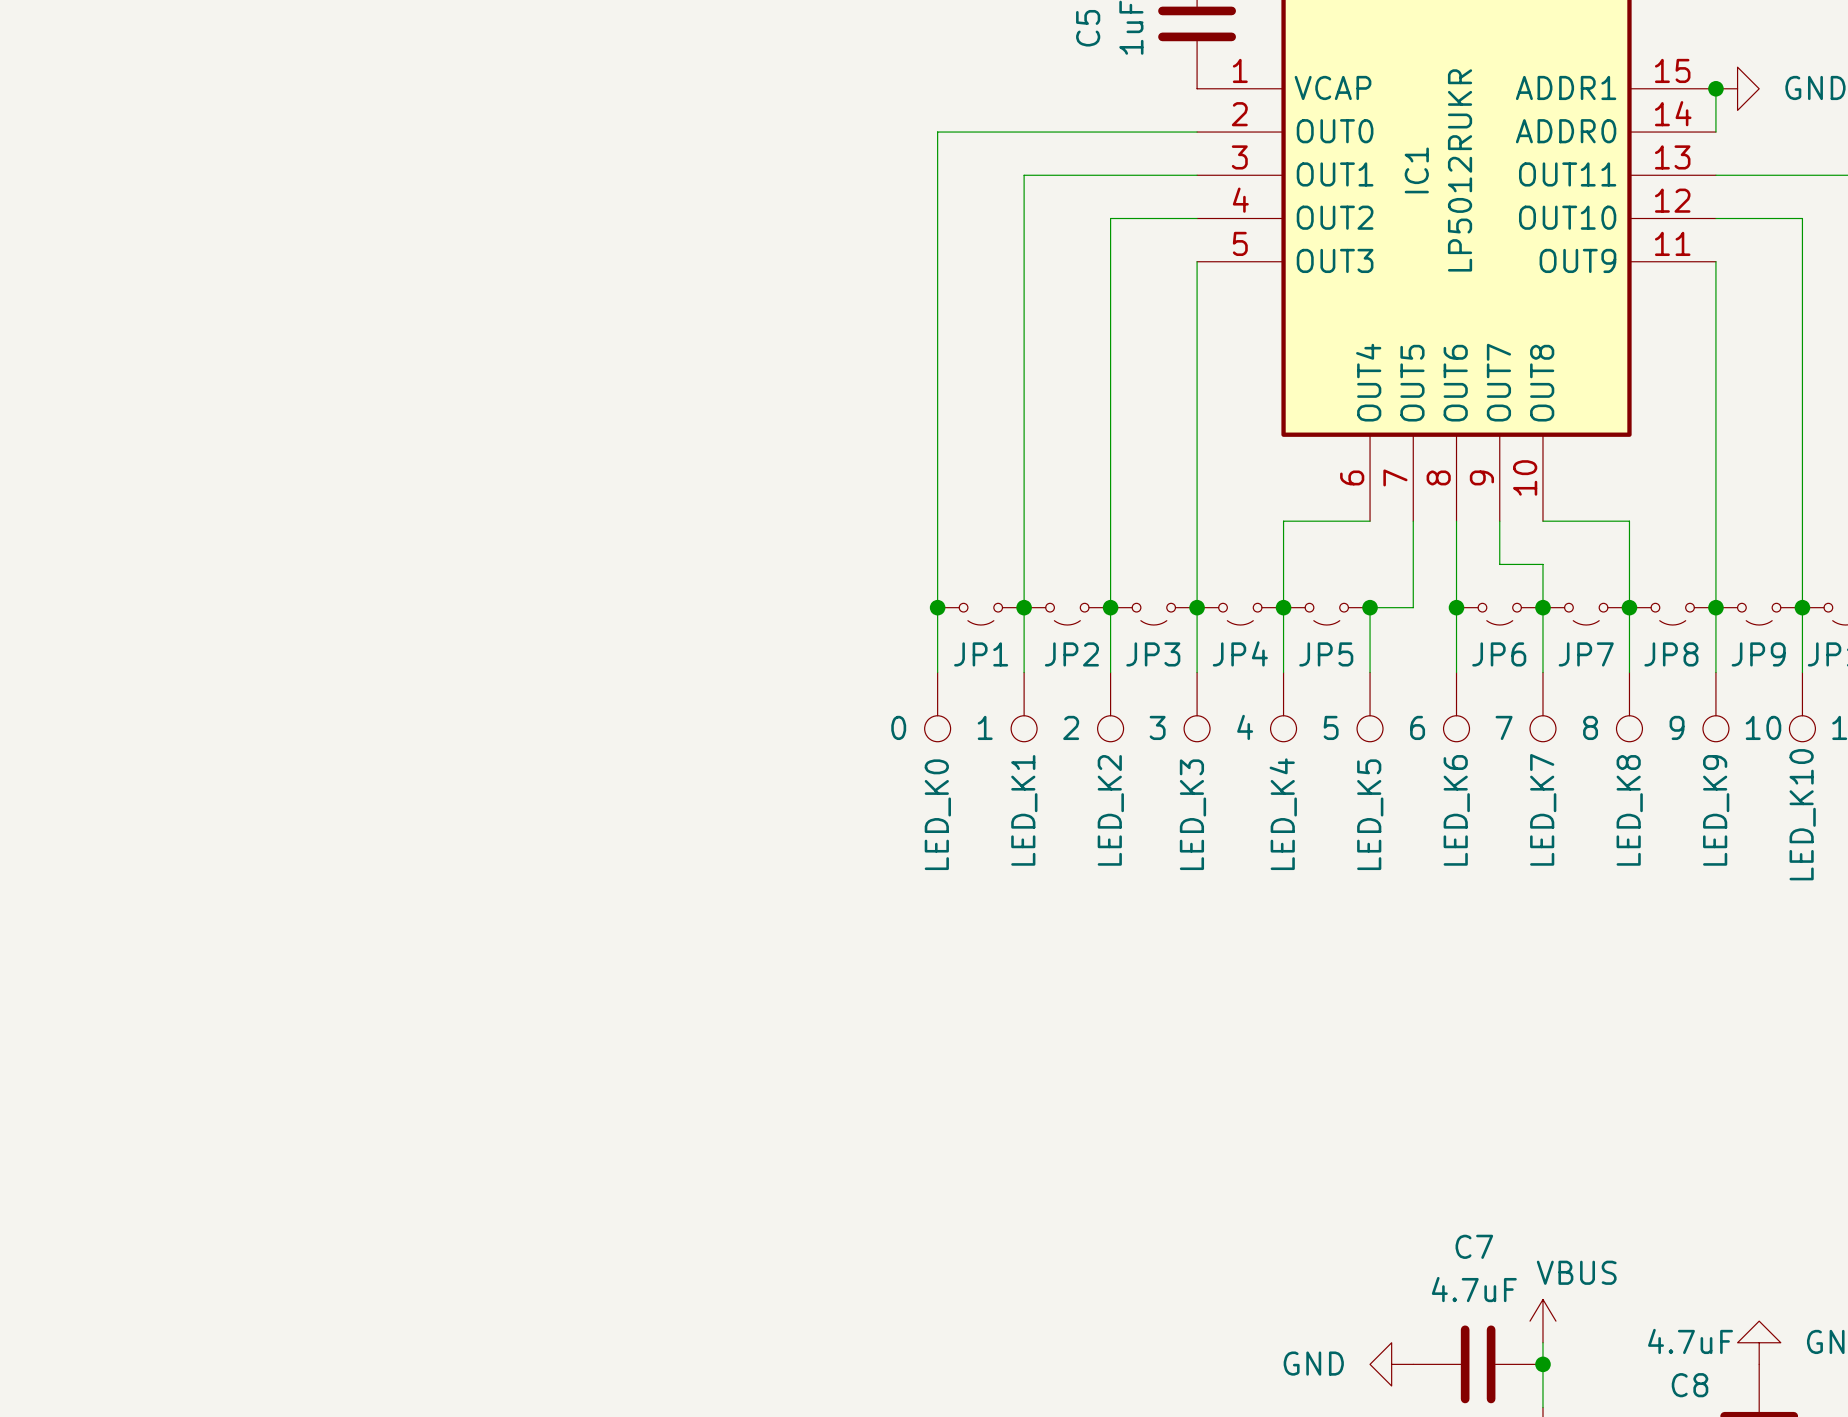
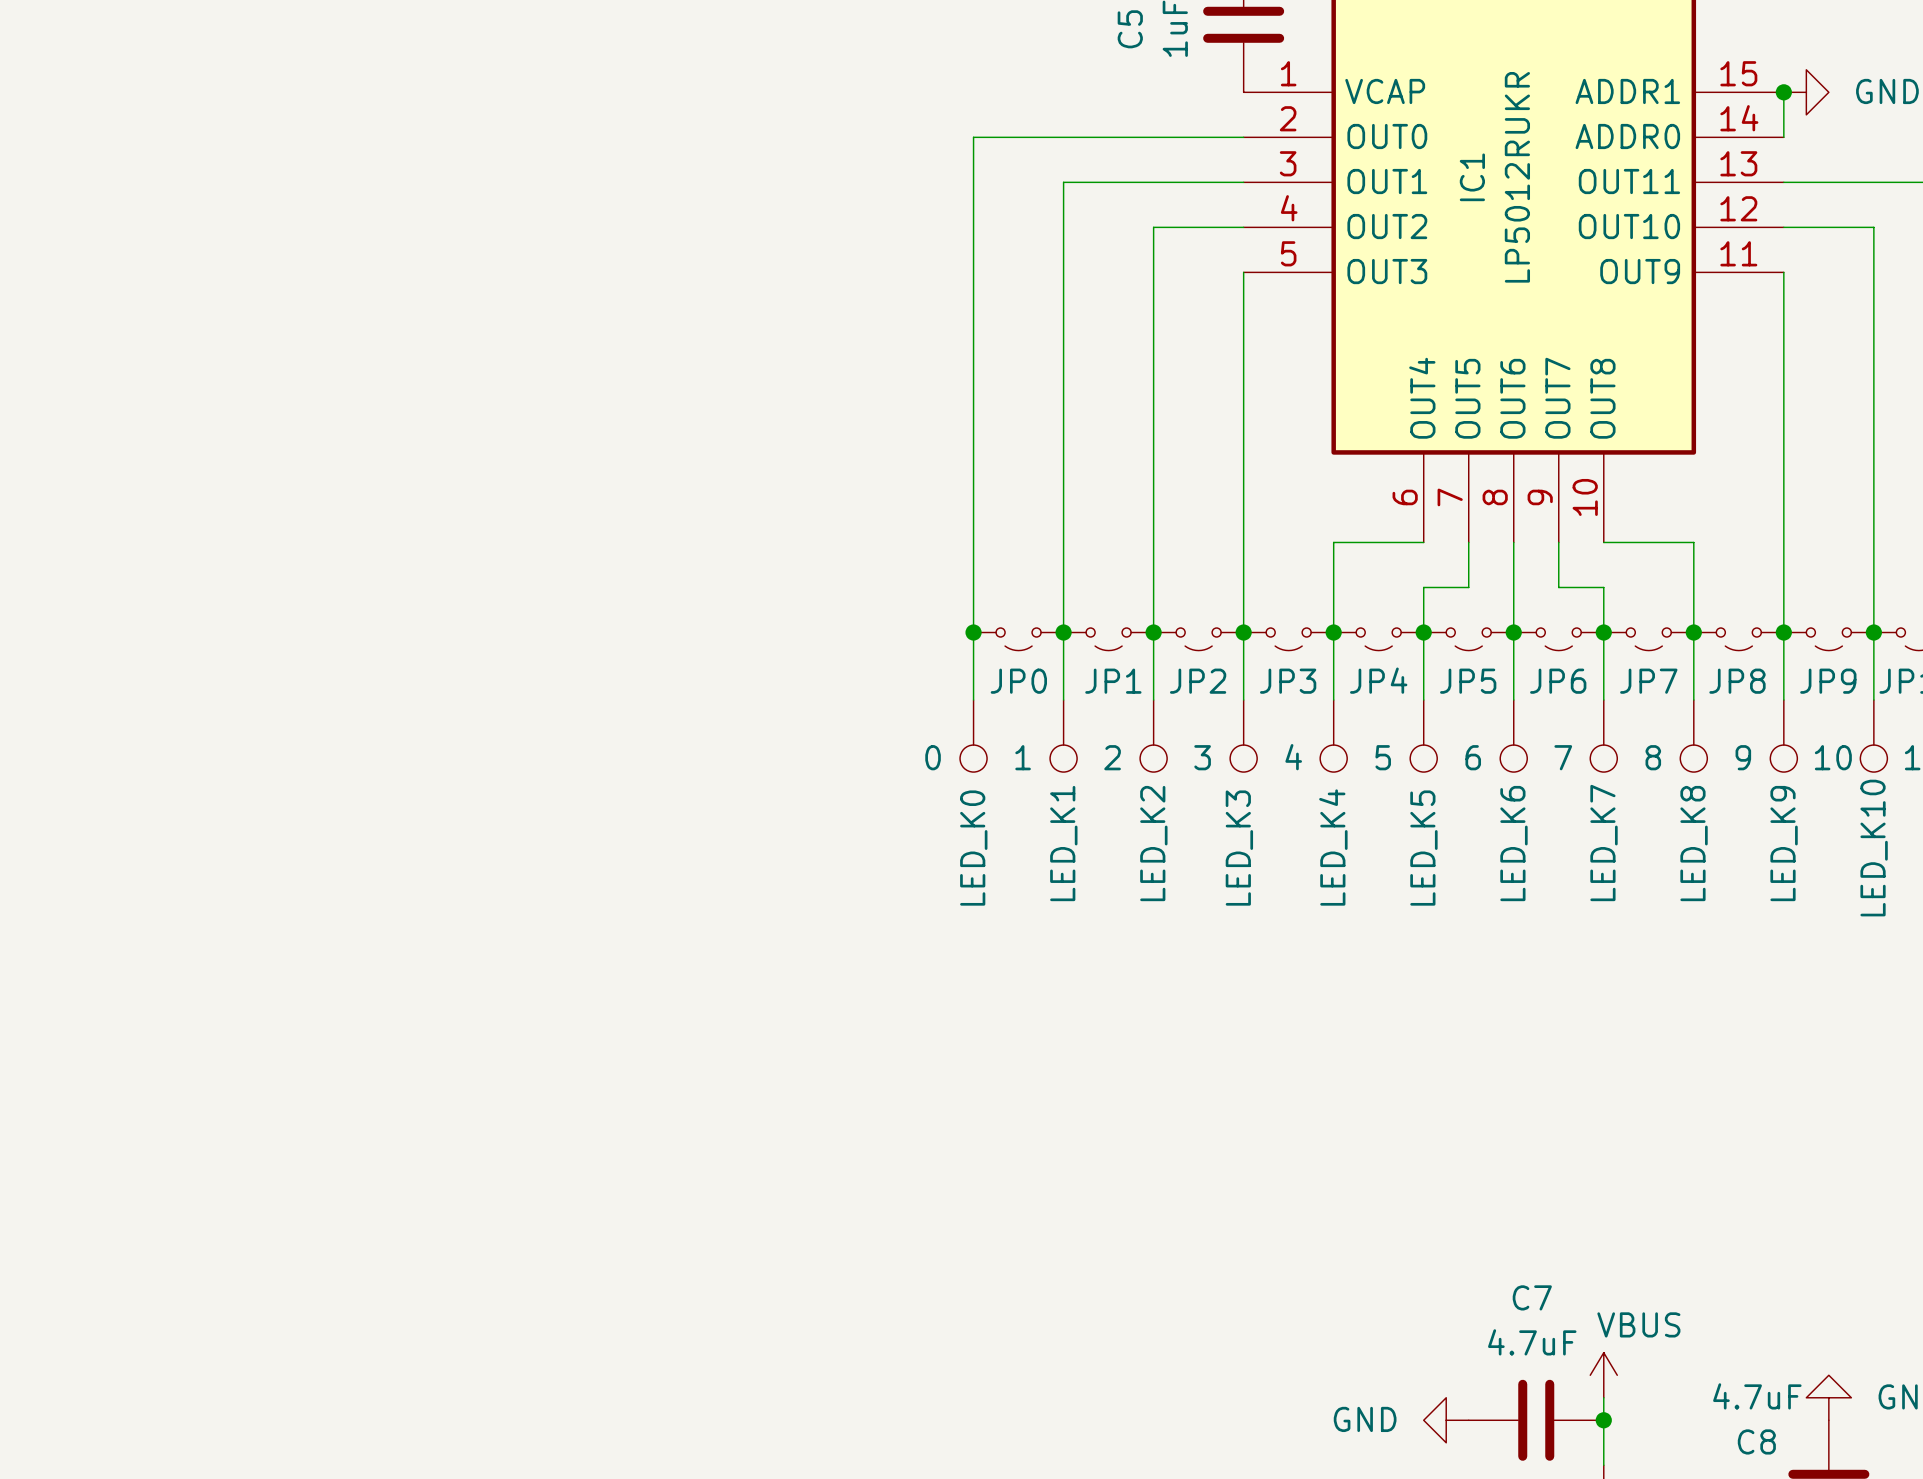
wire: (1413, 564) (1413, 607) (1370, 607) -> (1468, 587) (1423, 587) (1423, 632)
JP5: none -> (1468, 639)
JP4 name: JP4 (1240, 653) -> JP3 (1288, 681)
JP1 name: JP1 (981, 654) -> JP0 (1018, 681)
JP2 name: JP2 (1071, 654) -> JP1 (1113, 681)
JP3 name: JP3 (1153, 654) -> JP2 (1198, 681)
JP5 name: JP5 (1326, 654) -> JP4 (1378, 680)

